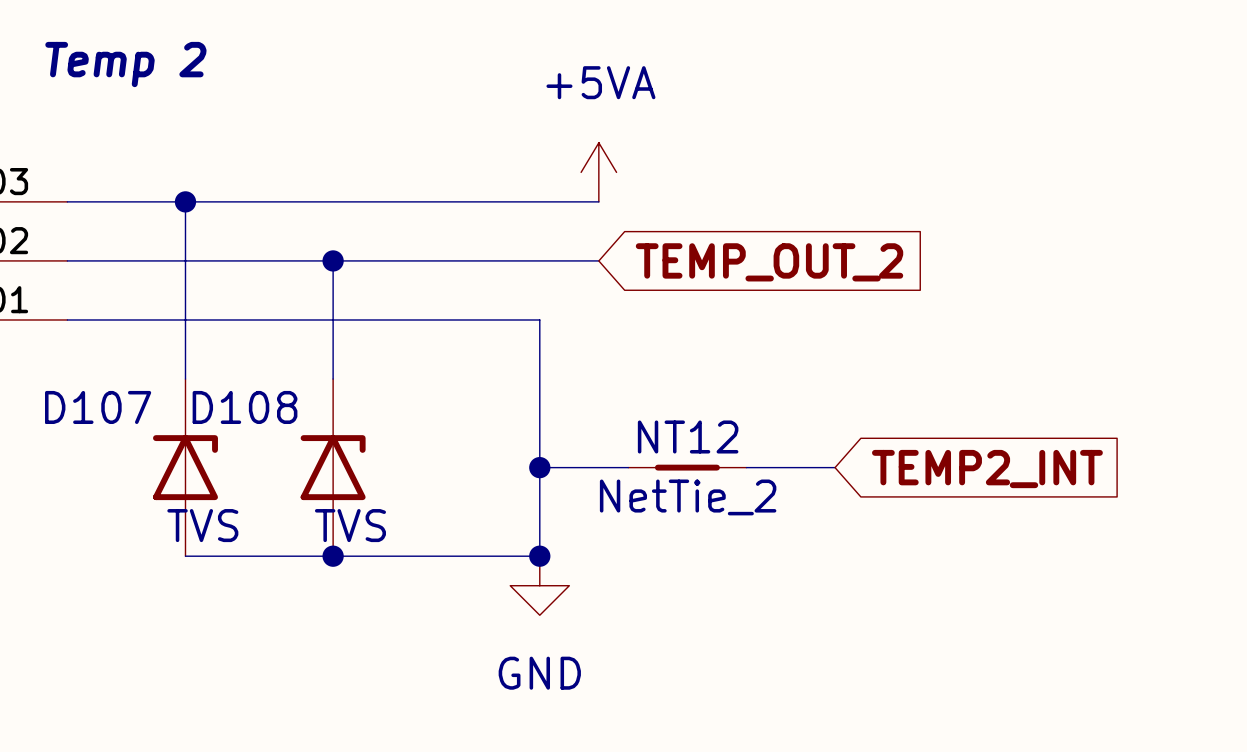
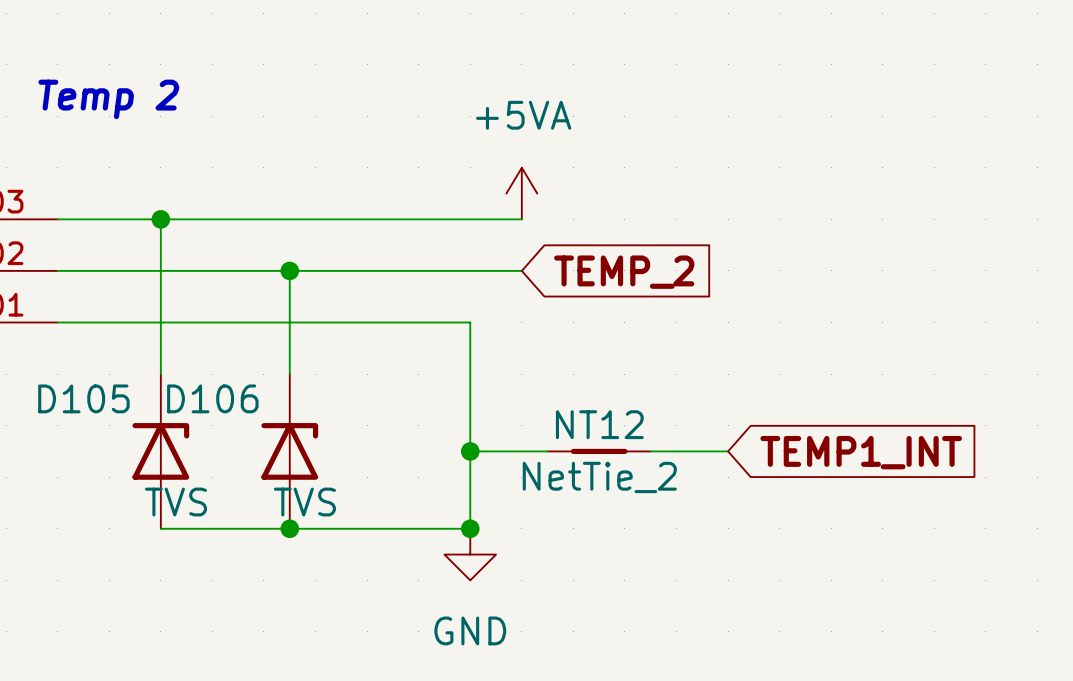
global label: TEMP_OUT_2 (769, 262) -> TEMP_2 (624, 272)
D107 name: D107 (98, 407) -> D105 (83, 398)
D108 name: D108 (245, 407) -> D106 (212, 398)
global label: TEMP2_INT (987, 469) -> TEMP1_INT (861, 452)

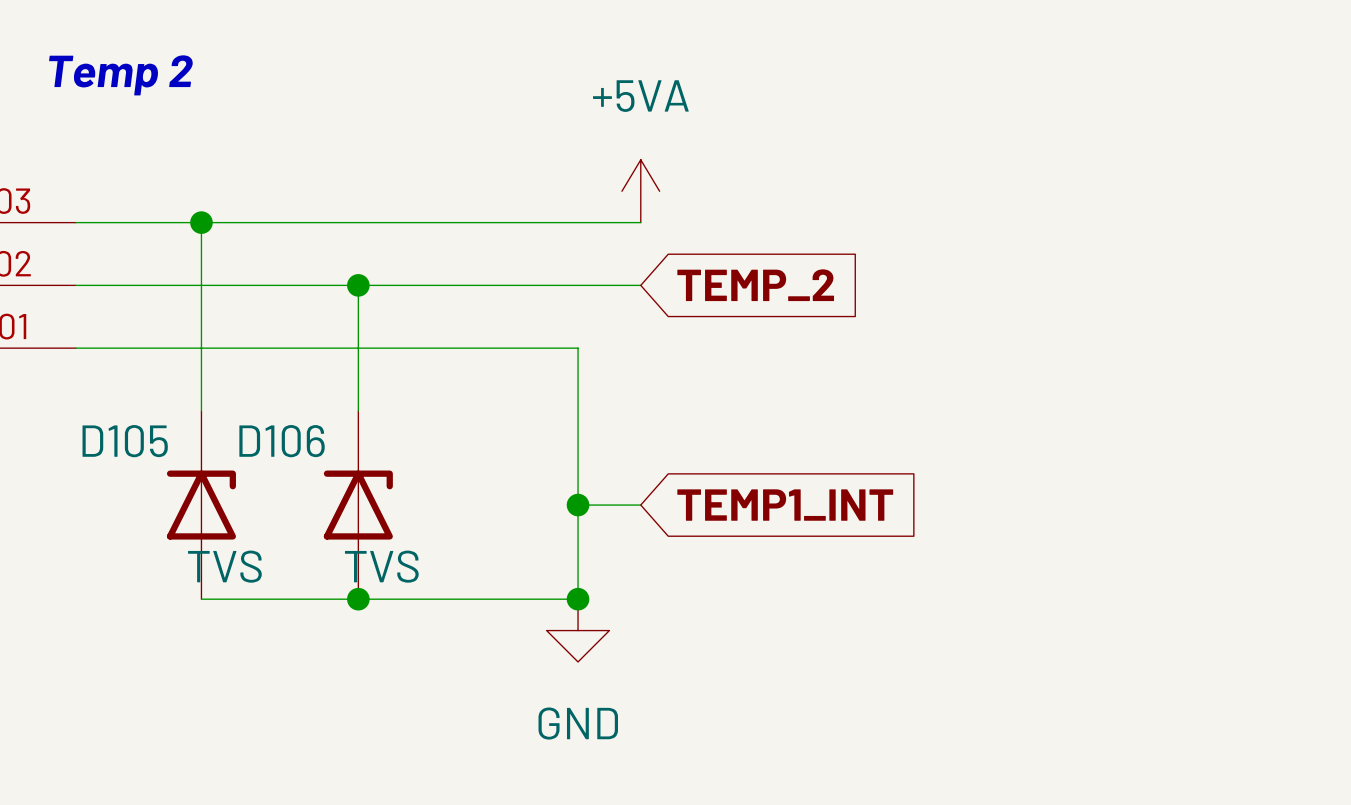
wire: (521, 451) (547, 451) -> none
NT12: NetTie_2 (599, 451) -> none
wire: (650, 451) (728, 451) -> none
global label position: TEMP1_INT (861, 452) -> TEMP1_INT (785, 505)

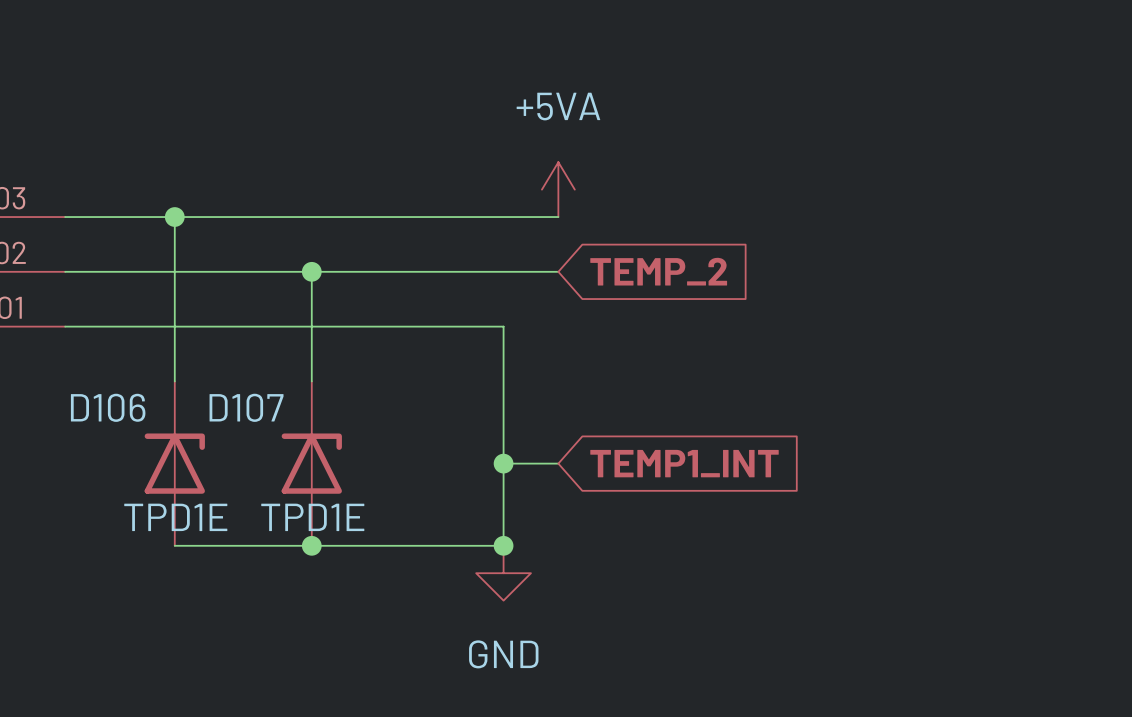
text: Temp 2 (121, 75) -> none
D105 name: D105 (125, 441) -> D106 (108, 407)
D106 name: D106 (282, 441) -> D107 (246, 407)
D105 value: TVS (224, 566) -> TPD1E (175, 517)
D106 value: TVS (381, 566) -> TPD1E (312, 517)

